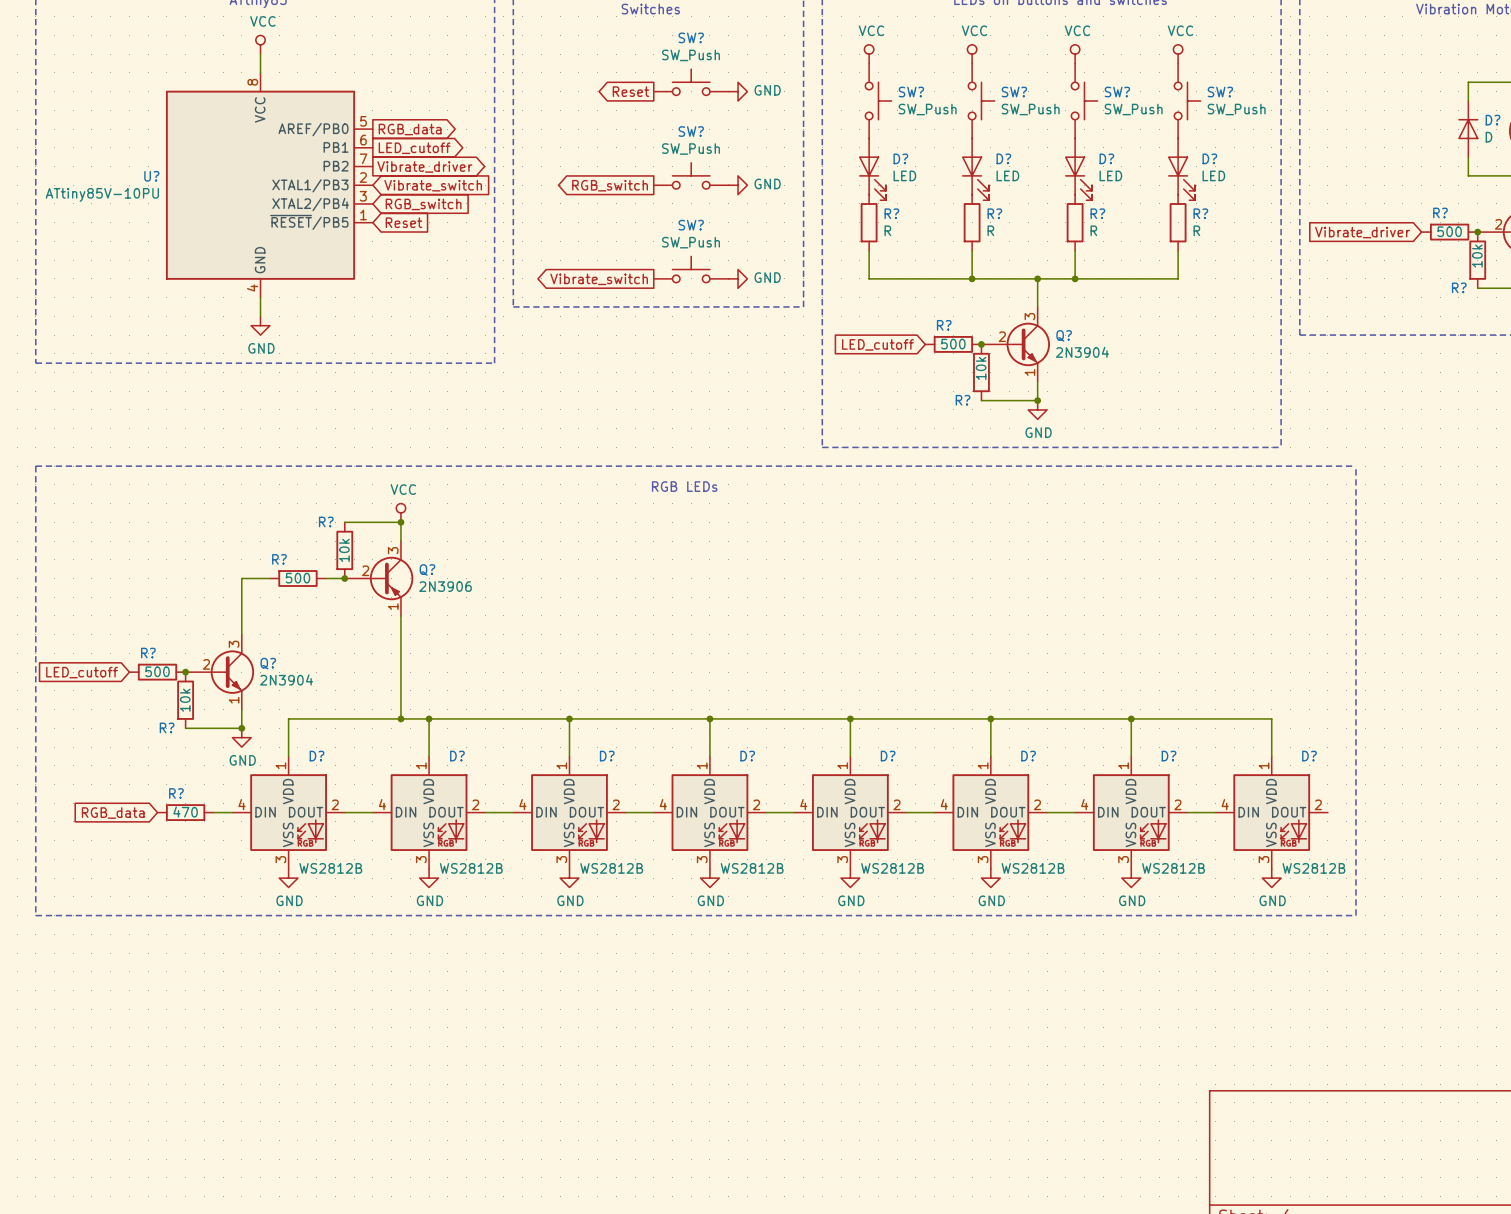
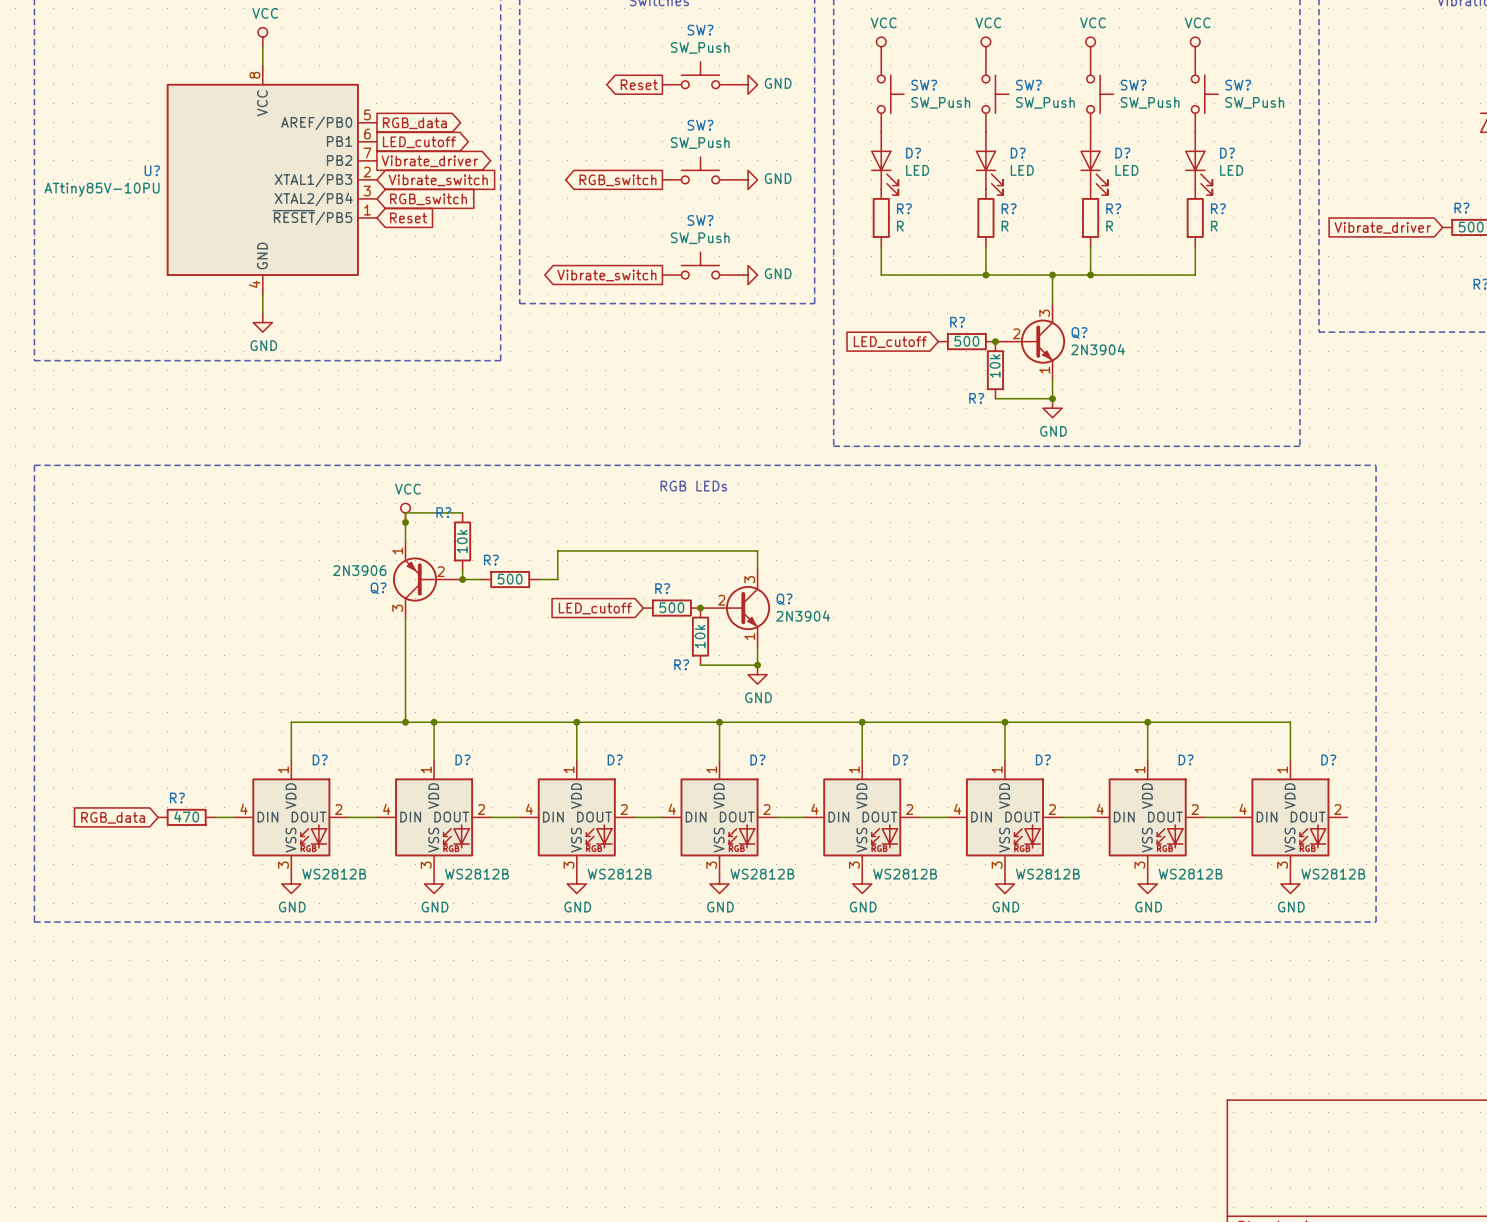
wire: (344, 522) (400, 522) -> (462, 512) (405, 512) (405, 522)
R? position: (344, 550) -> (462, 541)
wire: none -> (462, 570) (462, 579) (481, 579)
wire: none -> (757, 570) (757, 550) (557, 550) (557, 579) (538, 579)
wire: (269, 578) (241, 578) (241, 634) -> none
R?: 500 (297, 578) -> none
wire: (326, 578) (344, 578) -> none
junction: (344, 578) -> none
Q? rotation: 0° (391, 578) -> 180° (415, 579)
junction: none -> (462, 579)
R?: none -> 500 (510, 579)
R?: none -> 500 (671, 608)
junction: none -> (700, 608)
Q?: none -> 2N3904 (735, 608)
global label: none -> LED_cutoff (595, 608)
R?: none -> 10k (700, 636)
wire: none -> (757, 646) (757, 665) (700, 665)
junction: none -> (757, 665)
global label: LED_cutoff (82, 672) -> none
R?: 500 (157, 672) -> none
junction: (185, 672) -> none
Q?: 2N3904 (219, 672) -> none
power symbol: none -> GND (757, 674)
R?: 10k (185, 700) -> none
wire: (241, 709) (241, 728) (185, 728) -> none
junction: (241, 728) -> none
power symbol: GND (241, 737) -> none

